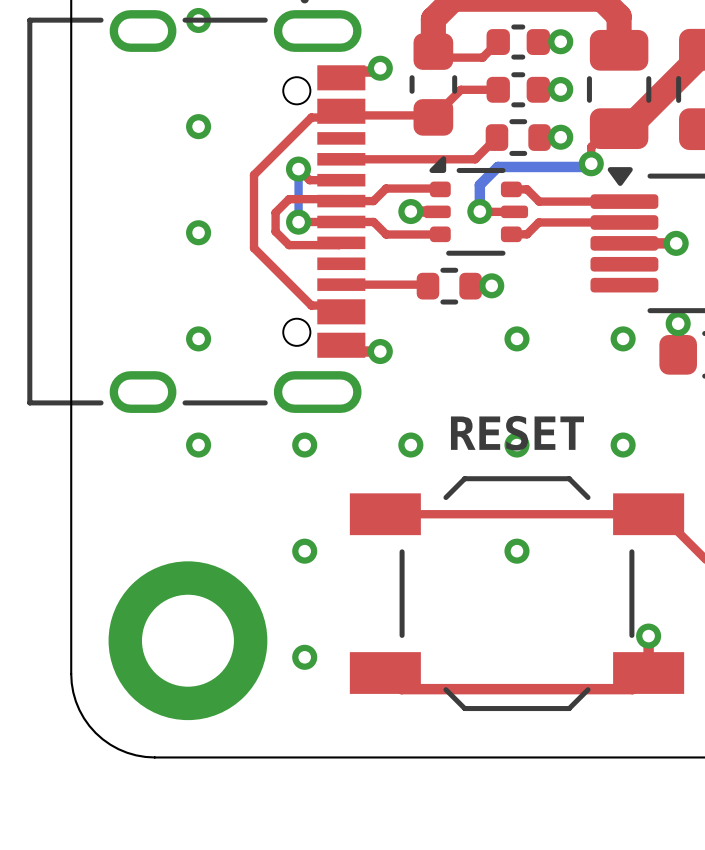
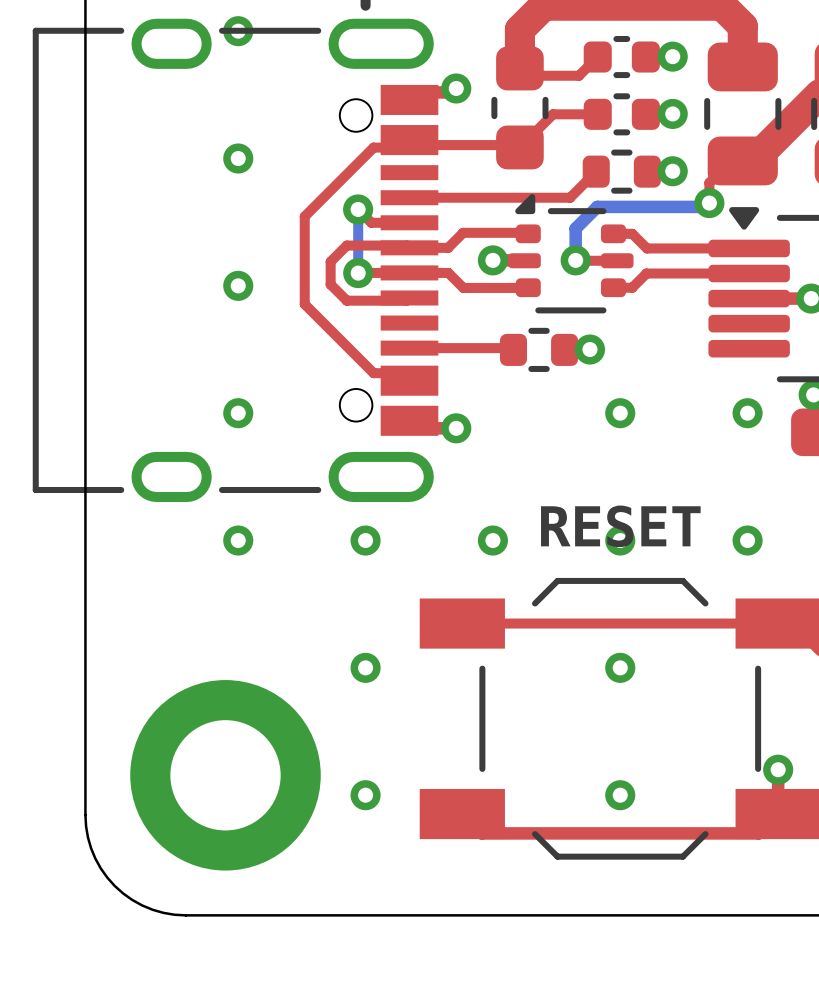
via: none -> (620, 795)

